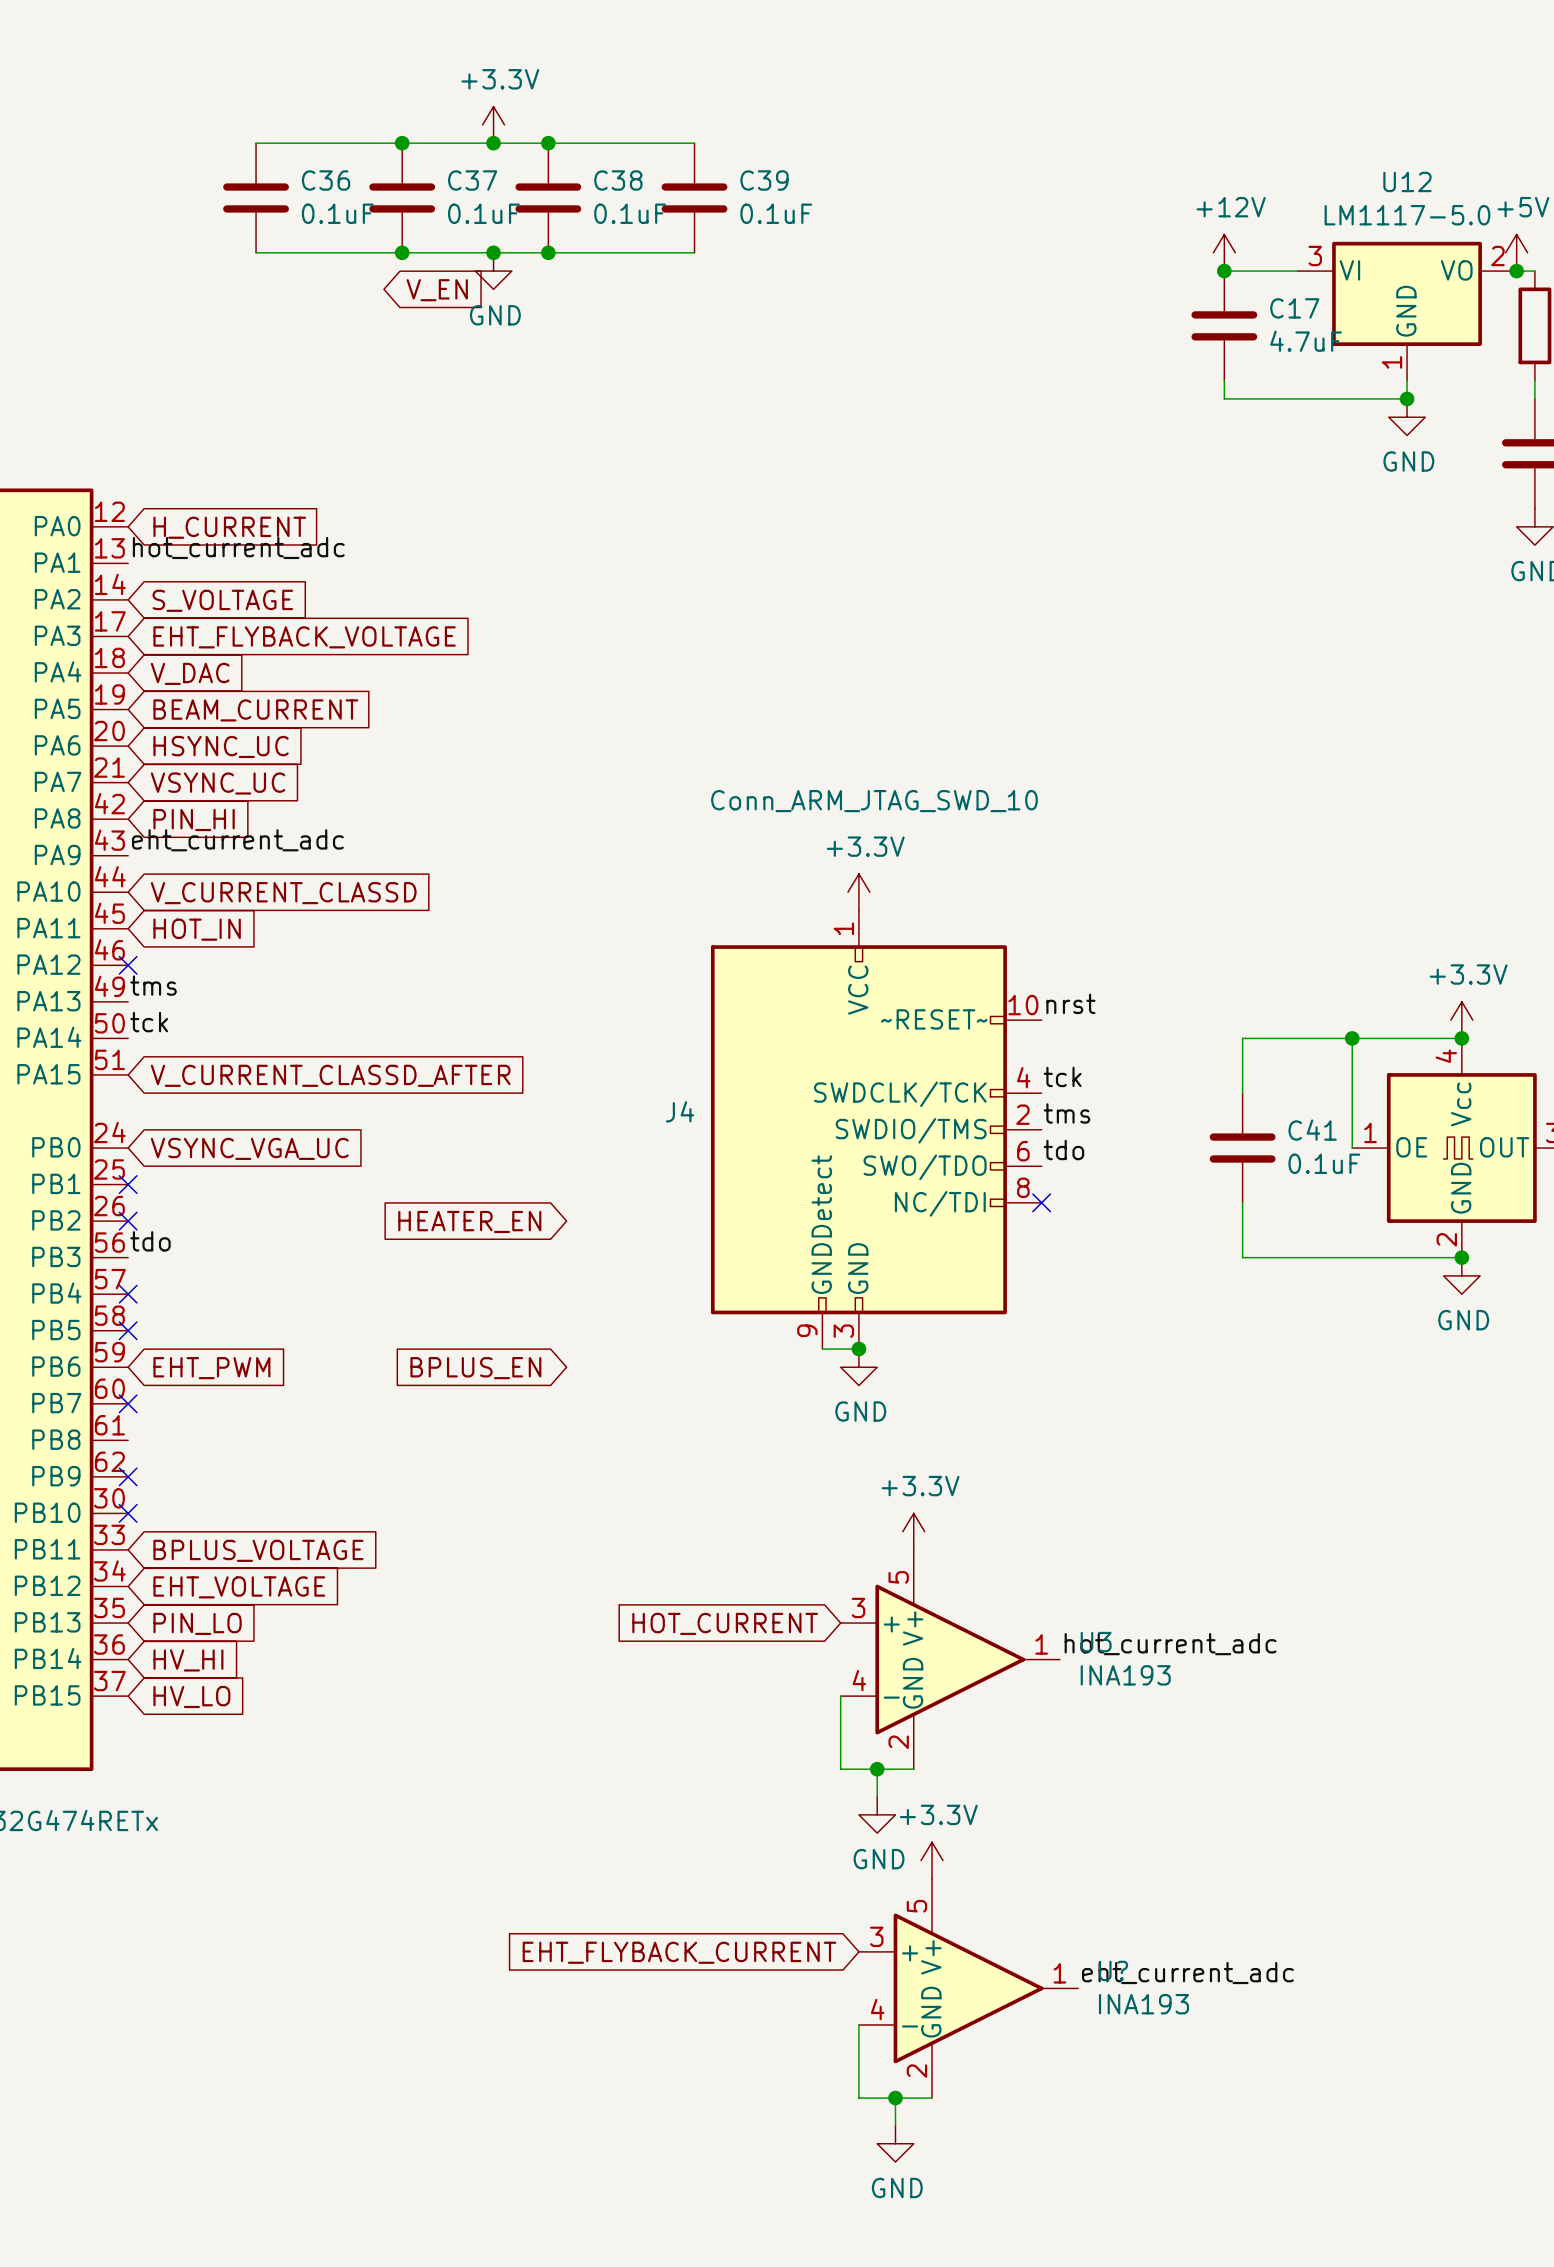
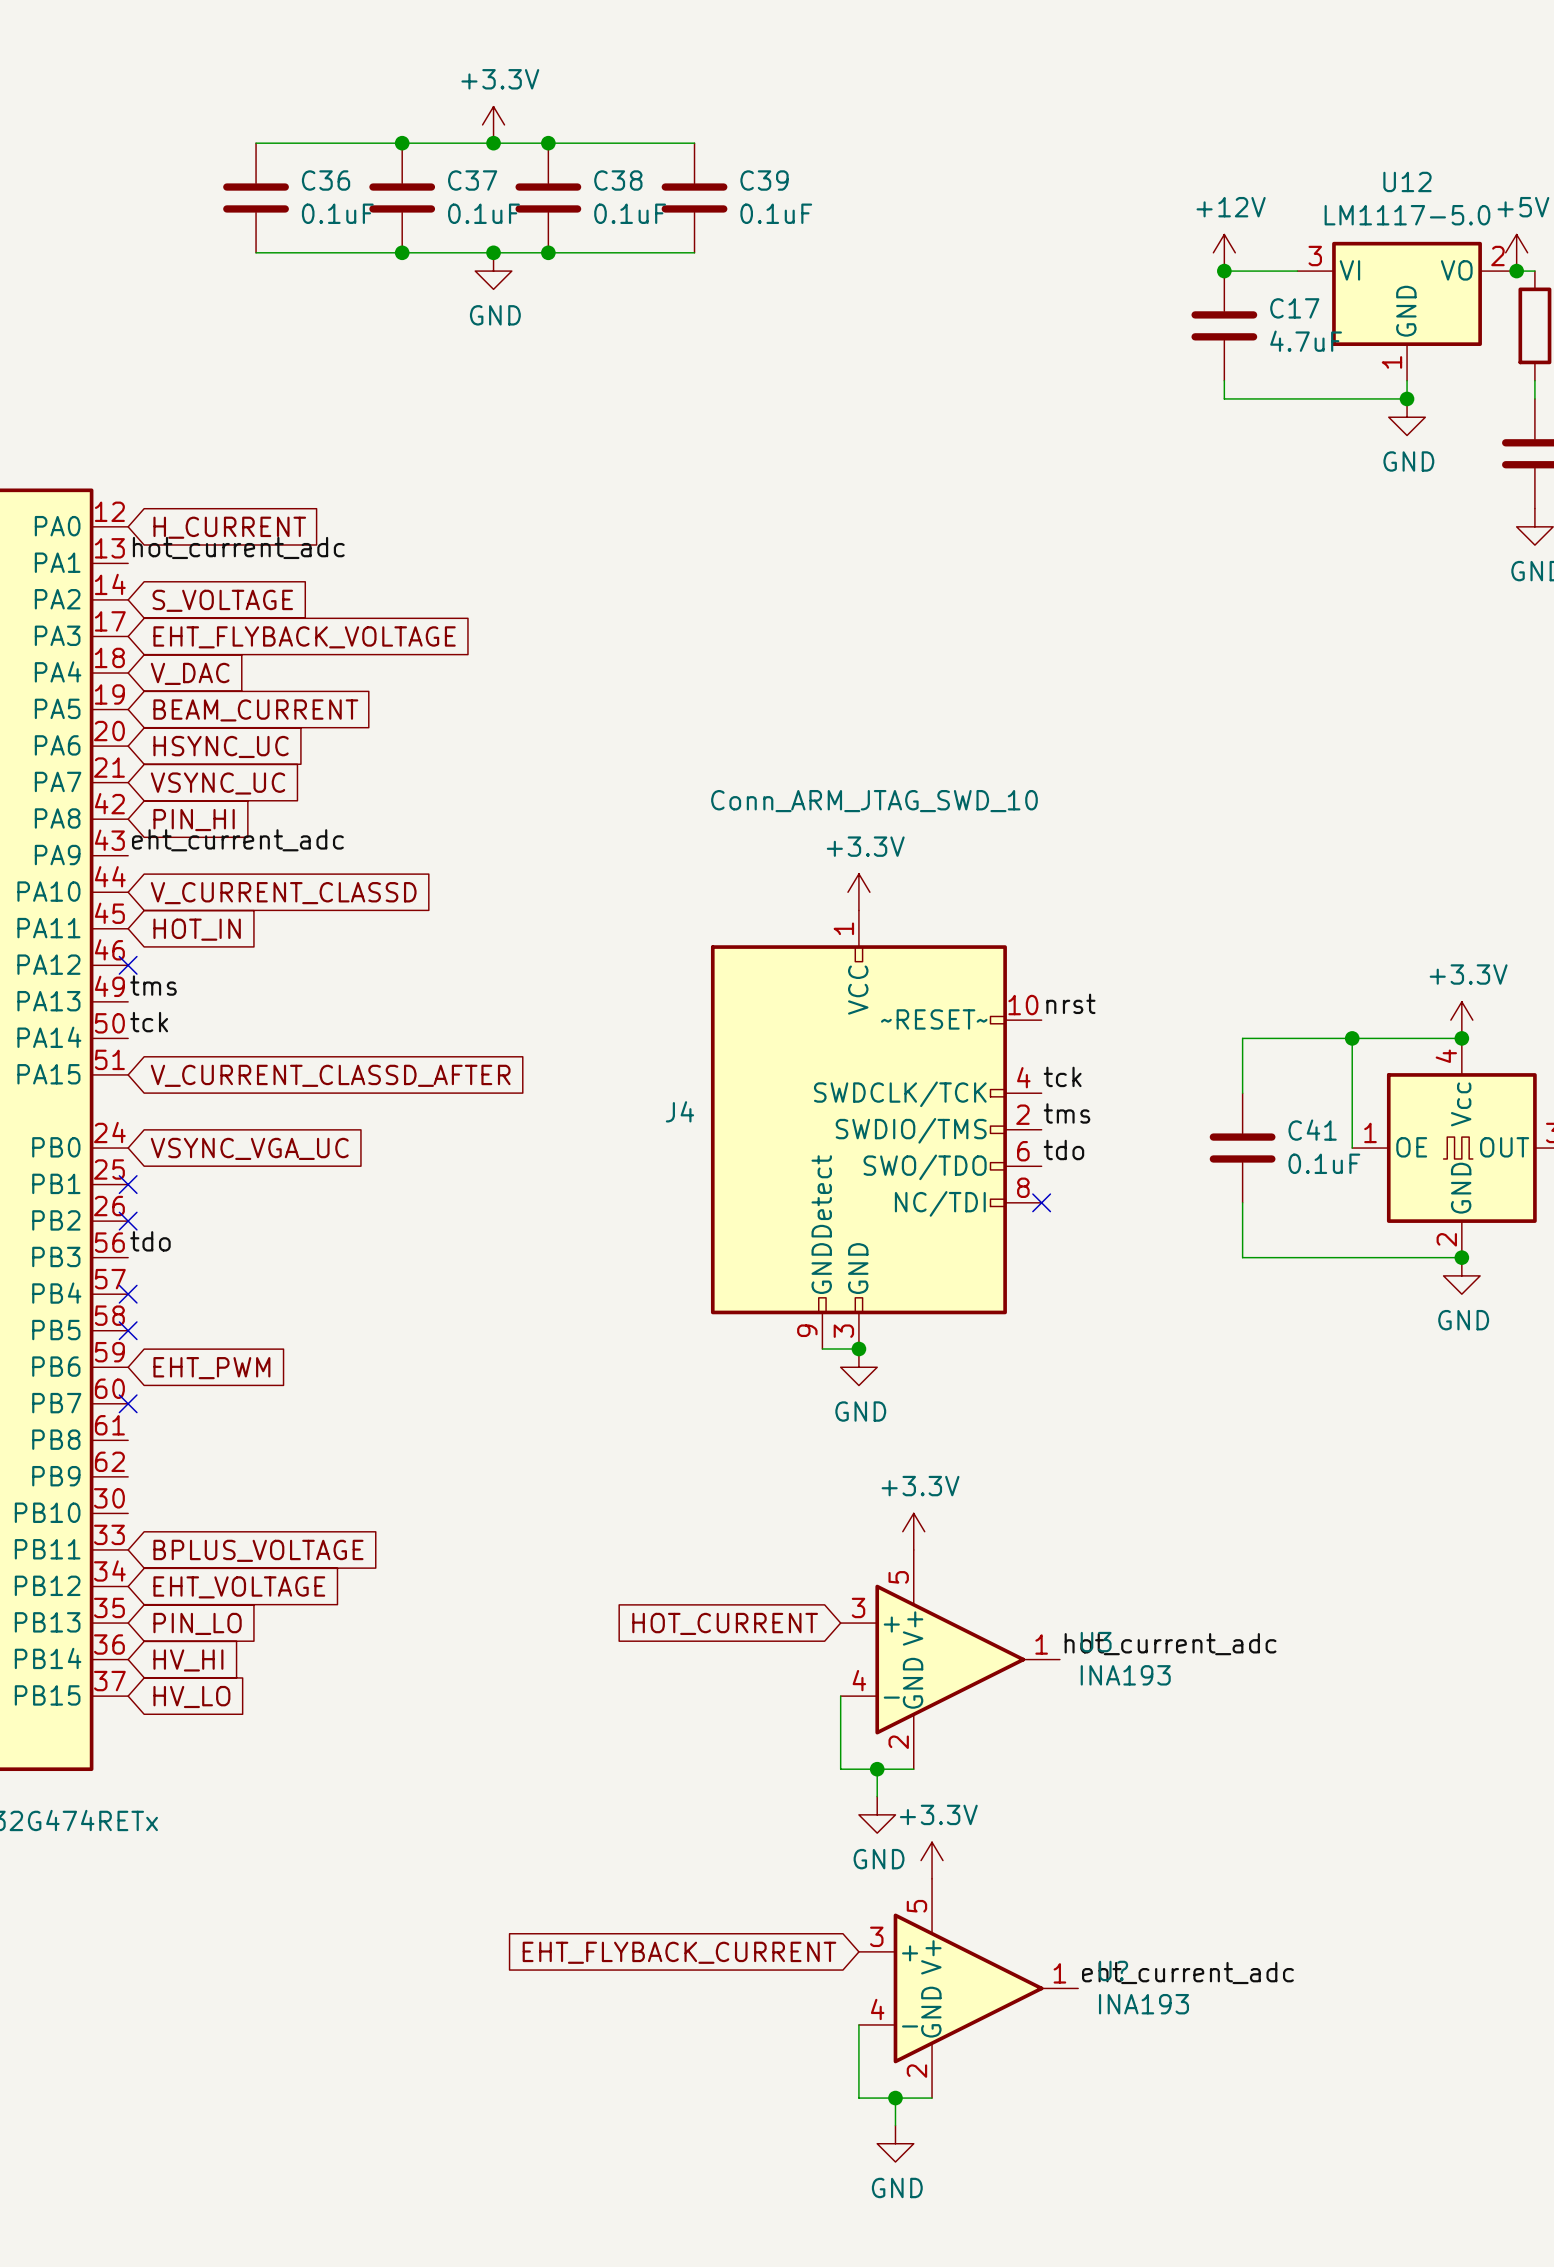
global label: V_EN (437, 290) -> none
global label: HEATER_EN (469, 1221) -> none
global label: BPLUS_EN (475, 1368) -> none
no-connect mark: (128, 1476) -> none
no-connect mark: (128, 1513) -> none

